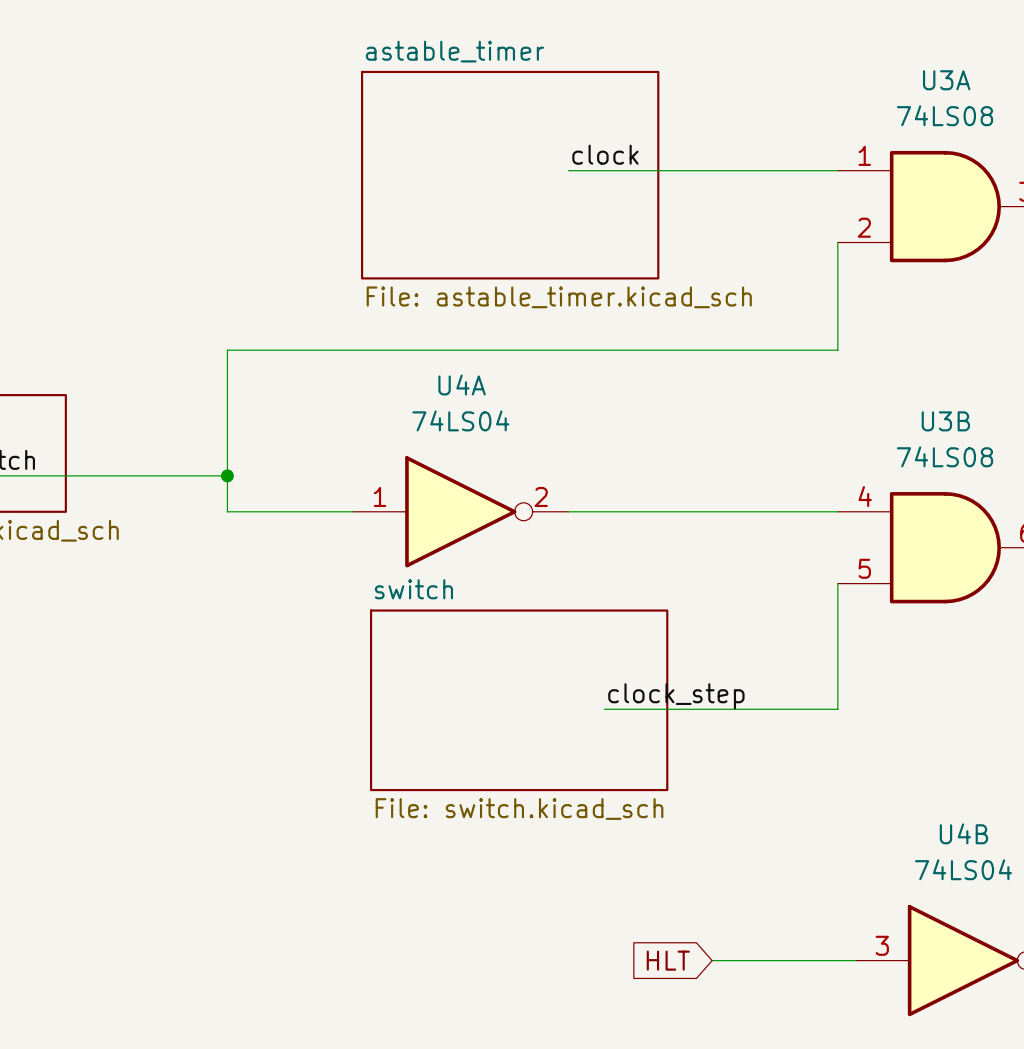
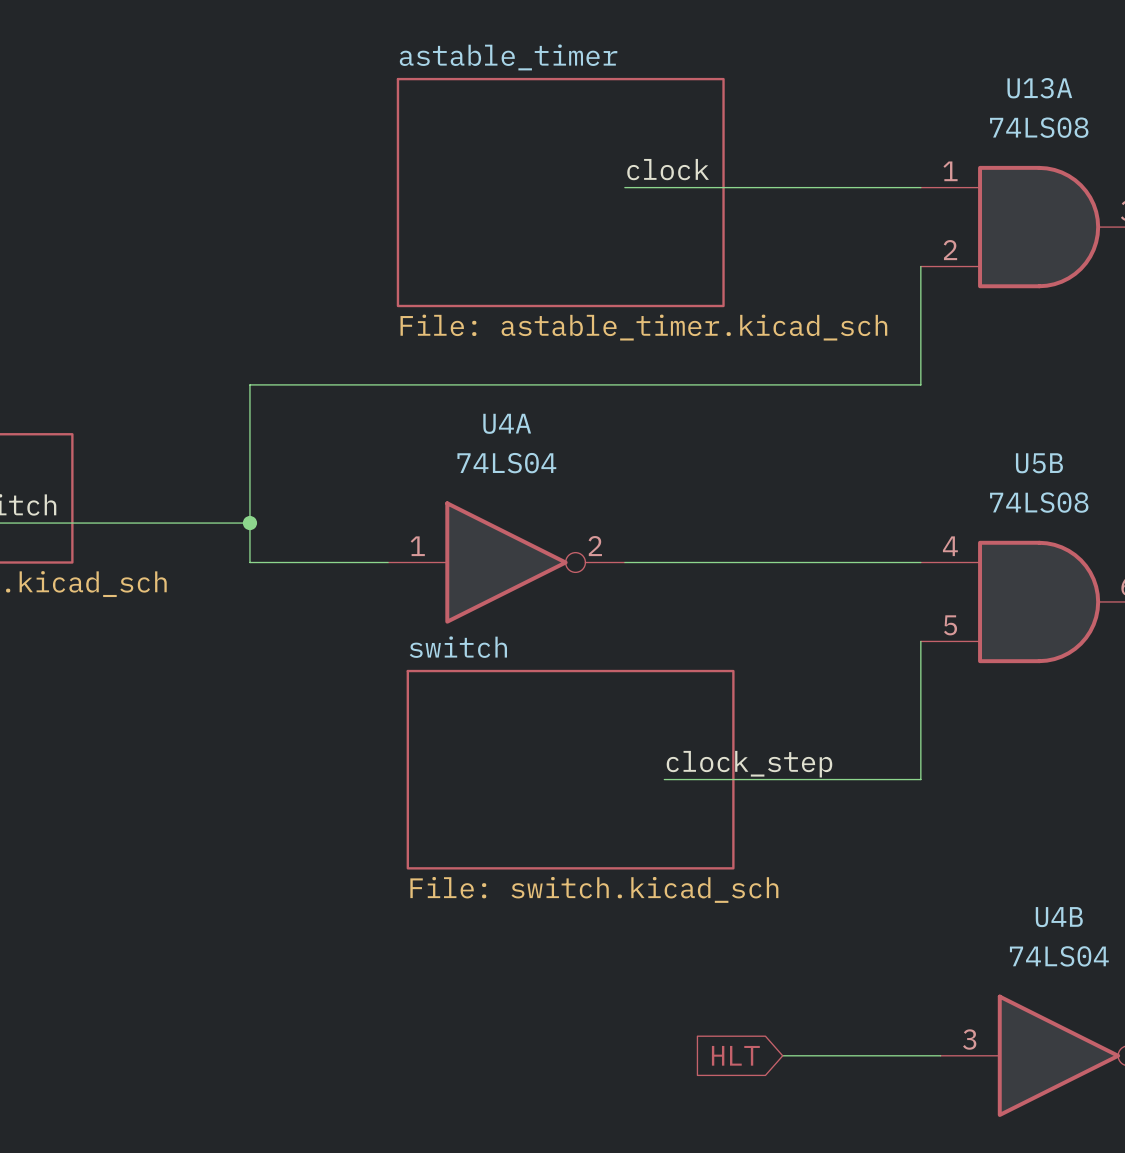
U3A name: U3A (946, 80) -> U13A (1039, 88)
U3B name: U3B (945, 421) -> U5B (1039, 463)

